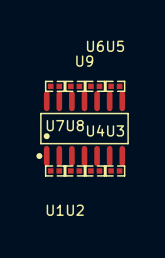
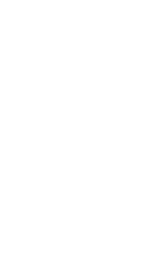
U7: (54, 86) -> none
U8: (75, 86) -> none
U6: (95, 86) -> none
U5: (115, 86) -> none
U9: (82, 128) -> none
U1: (54, 170) -> none
U2: (75, 170) -> none
U4: (95, 170) -> none
U3: (115, 170) -> none

